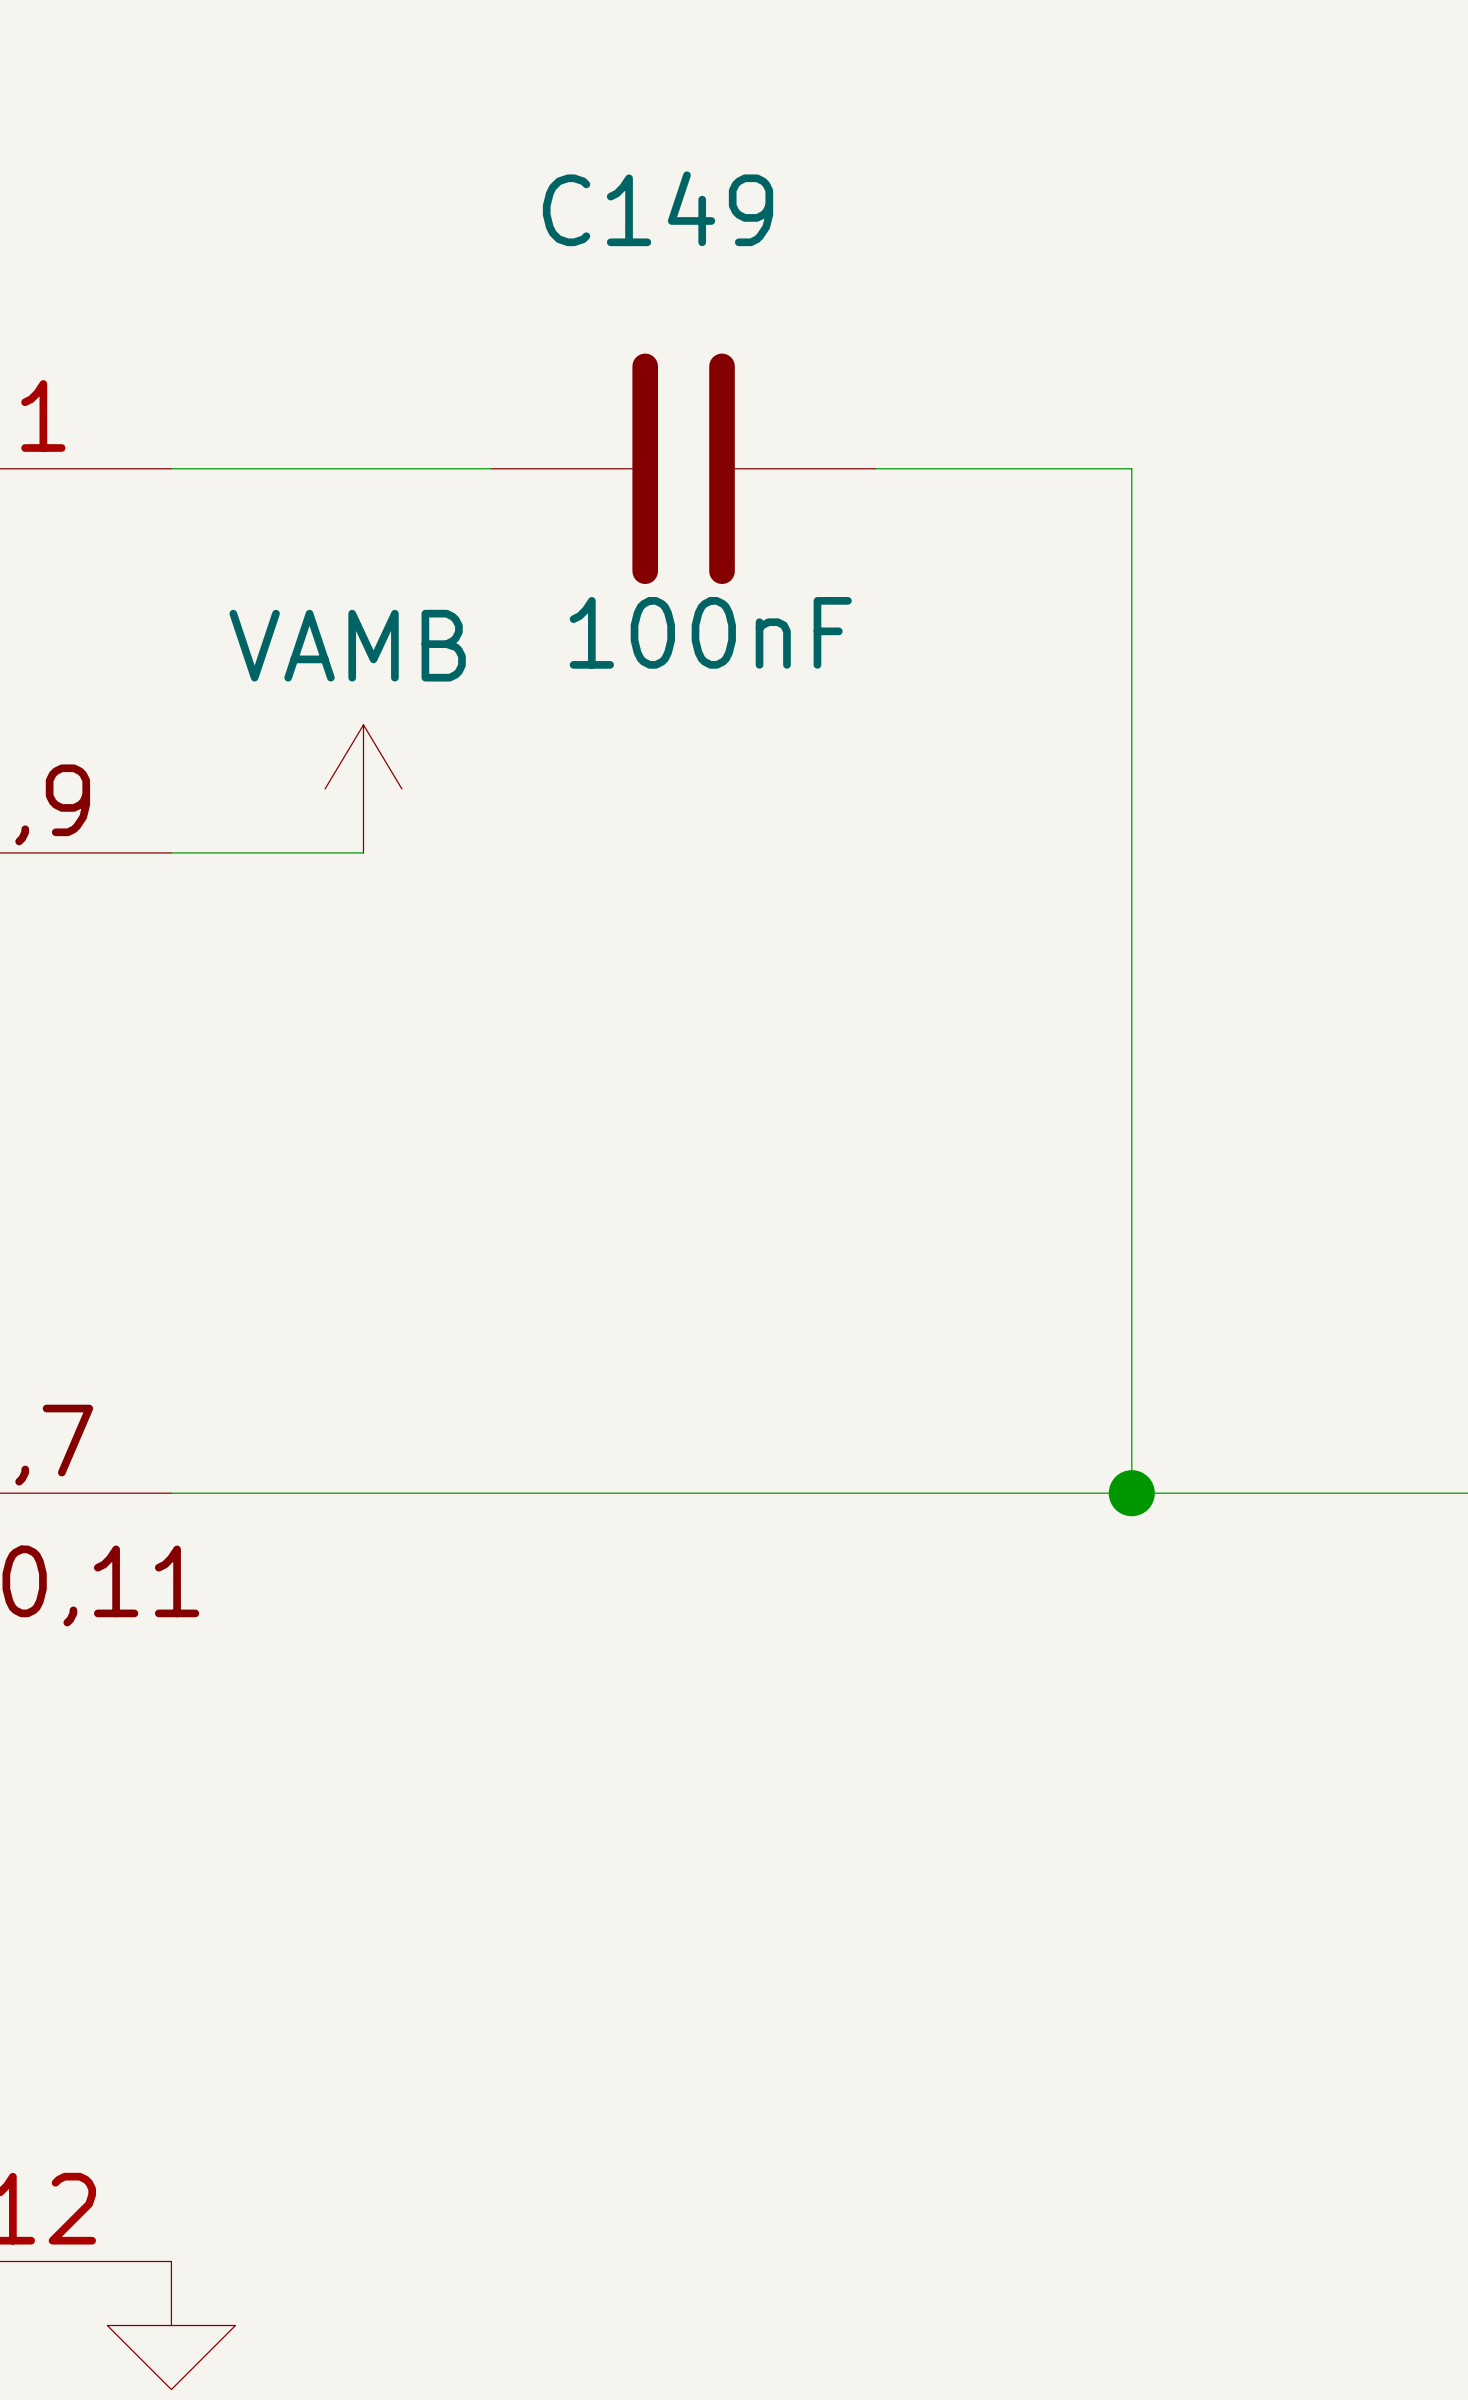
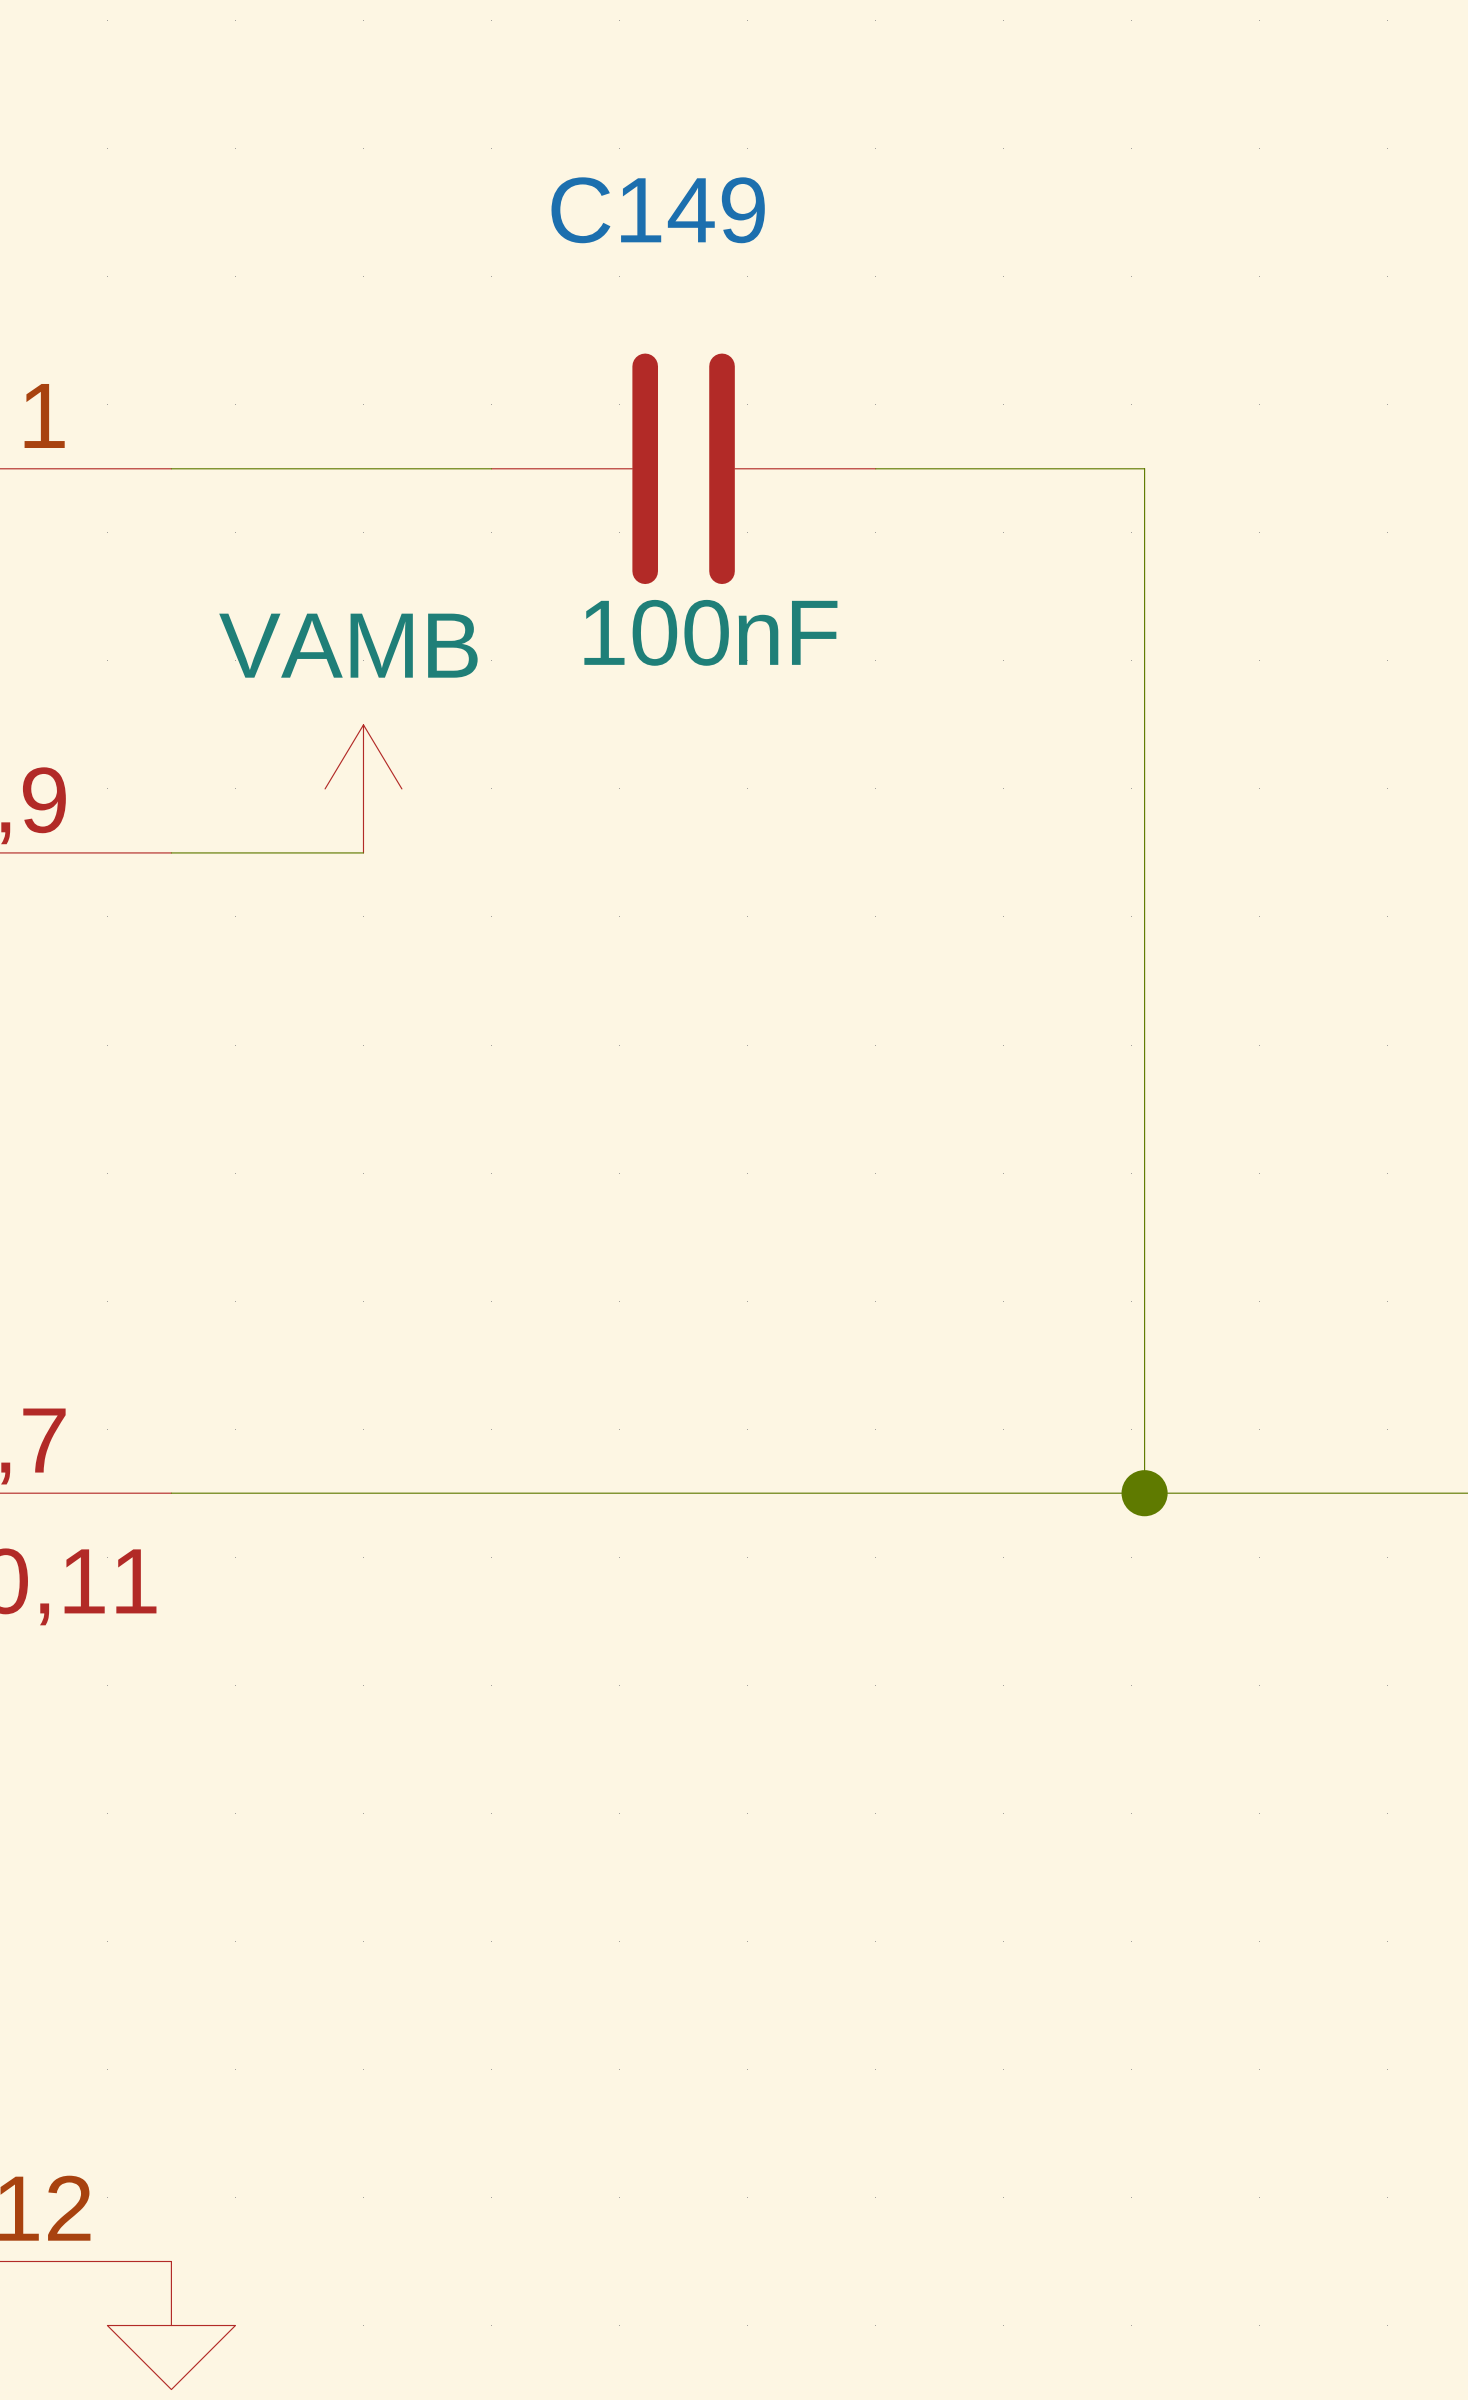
wire: (1131, 468) (1131, 1493) -> (1131, 468) (1144, 468) (1144, 1493)
junction position: (1131, 1493) -> (1144, 1493)

